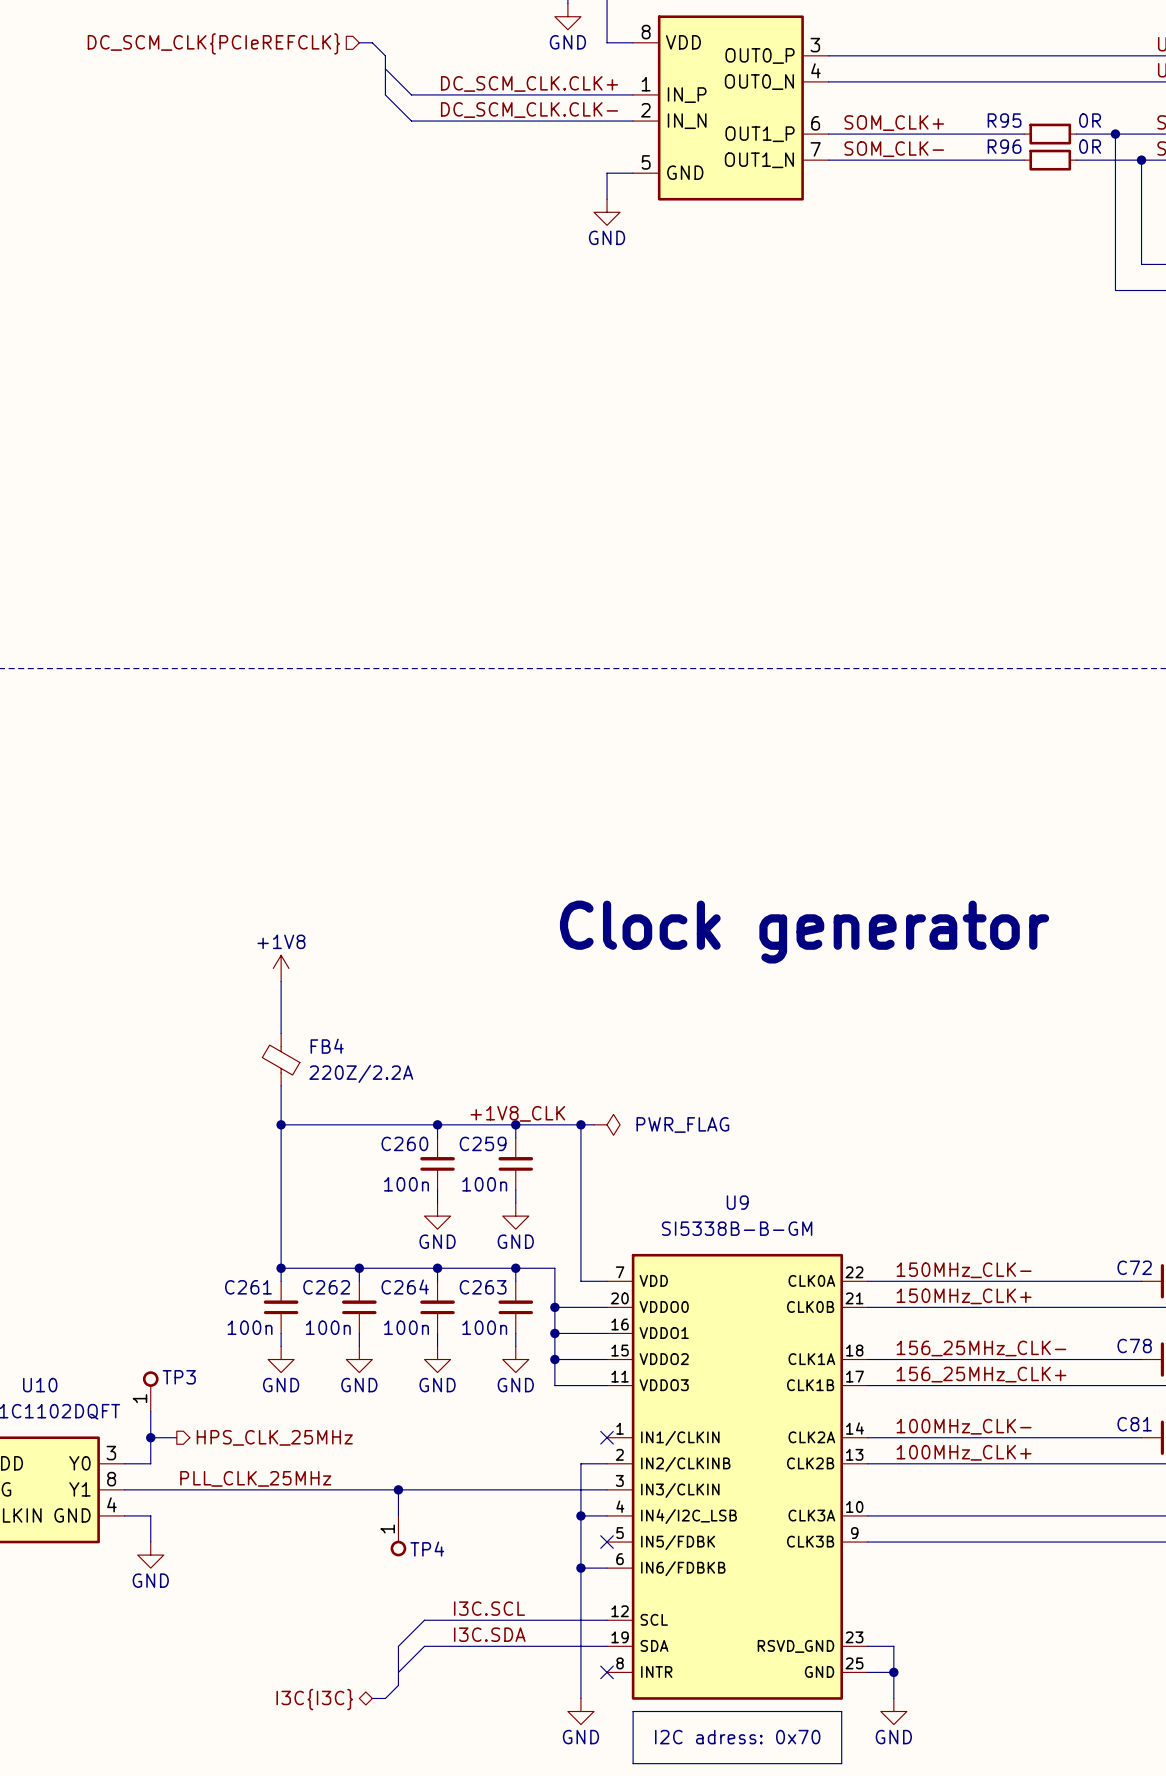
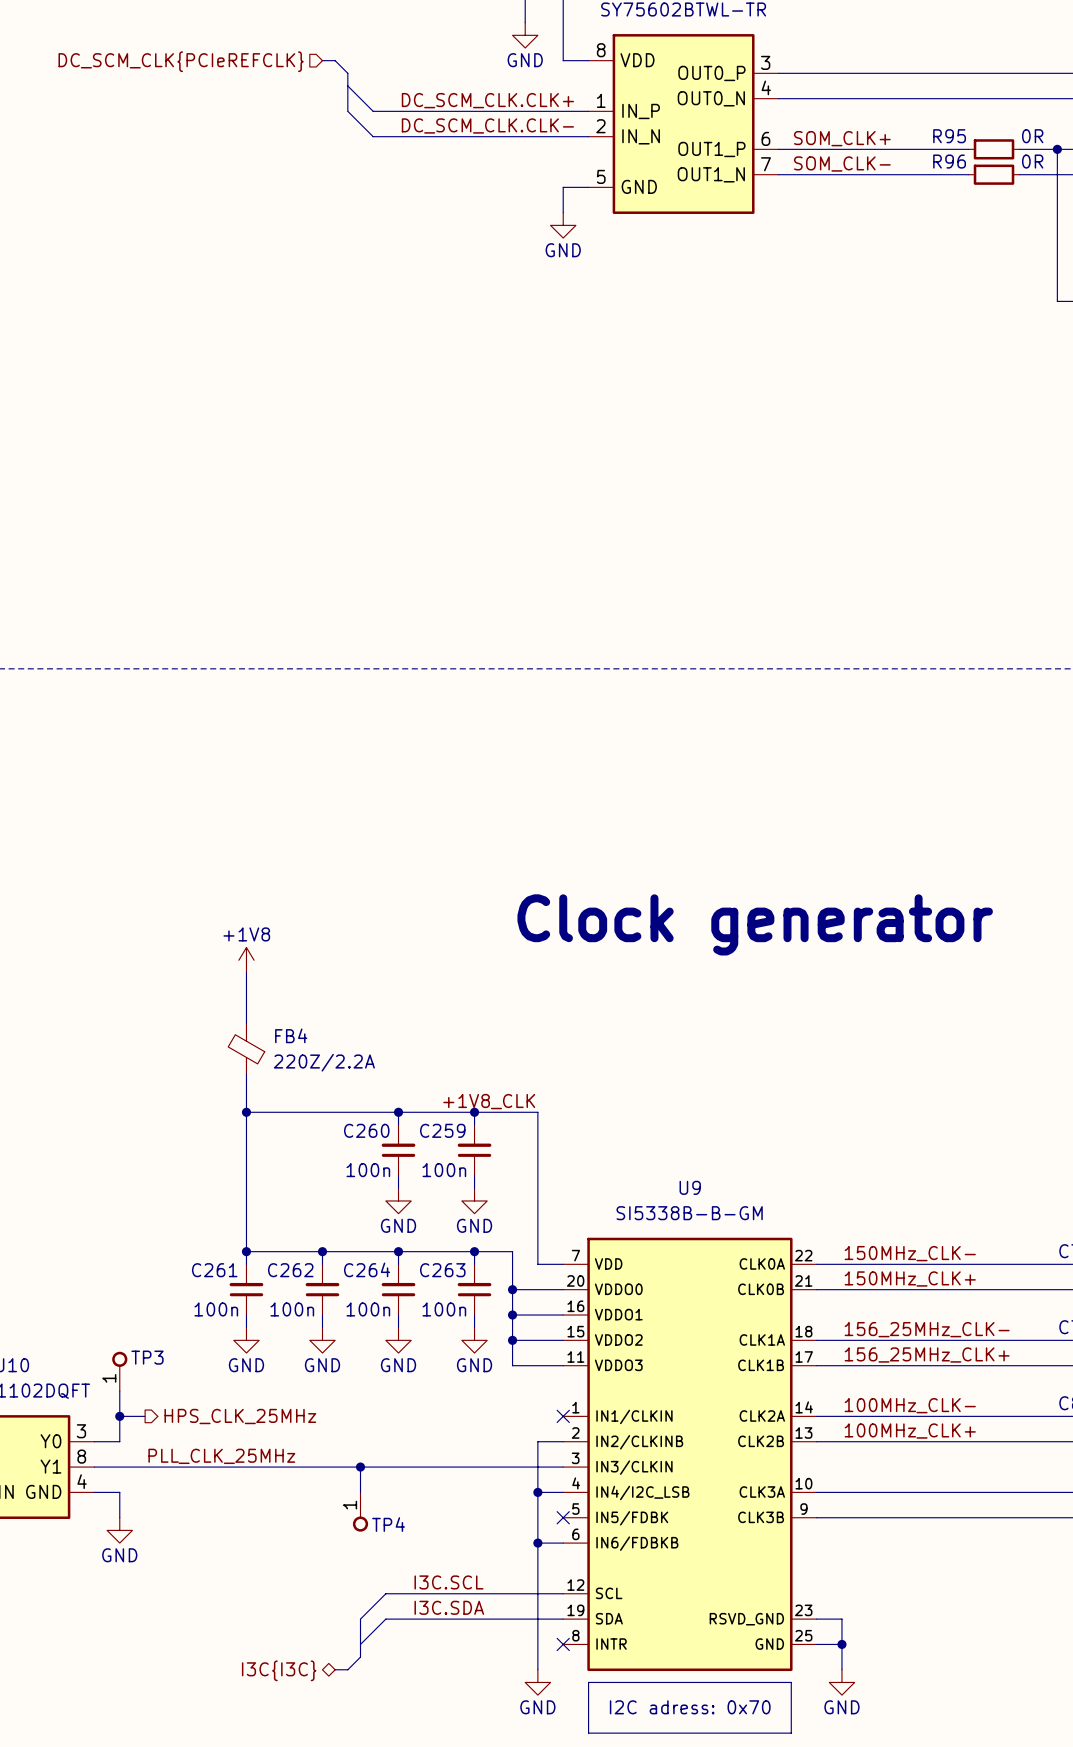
label position: +1V8_CLK (517, 1113) -> +1V8_CLK (489, 1101)
wire: (580, 1124) (593, 1124) -> none
junction: (580, 1124) -> none
power symbol: PWR_FLAG (607, 1124) -> none

